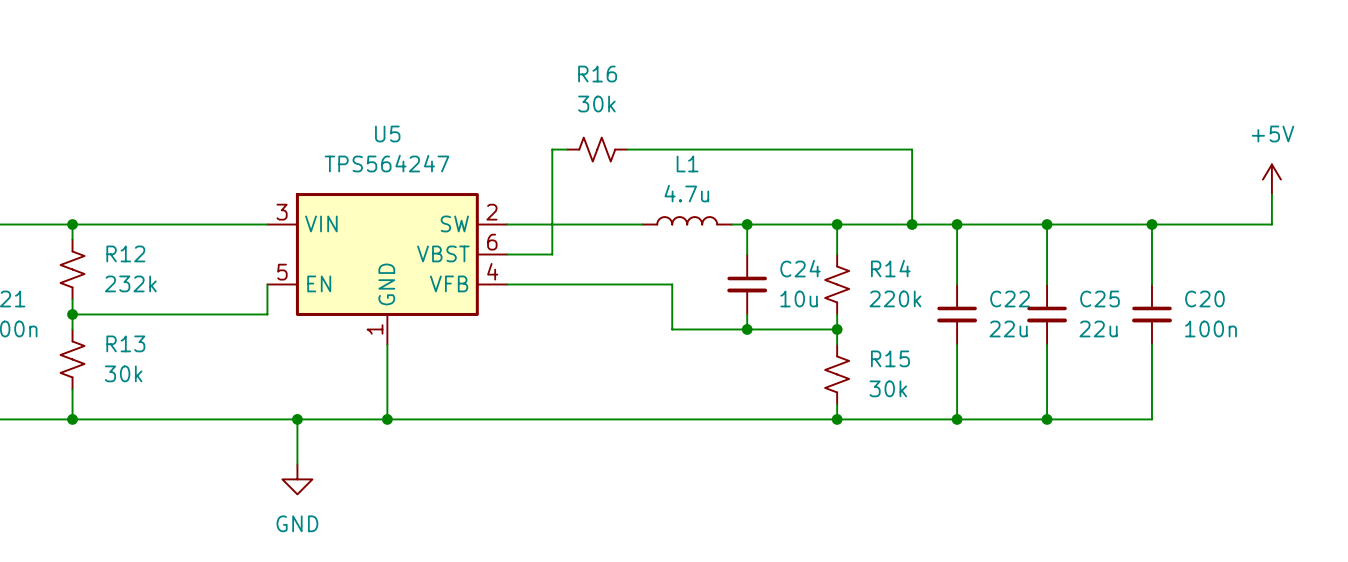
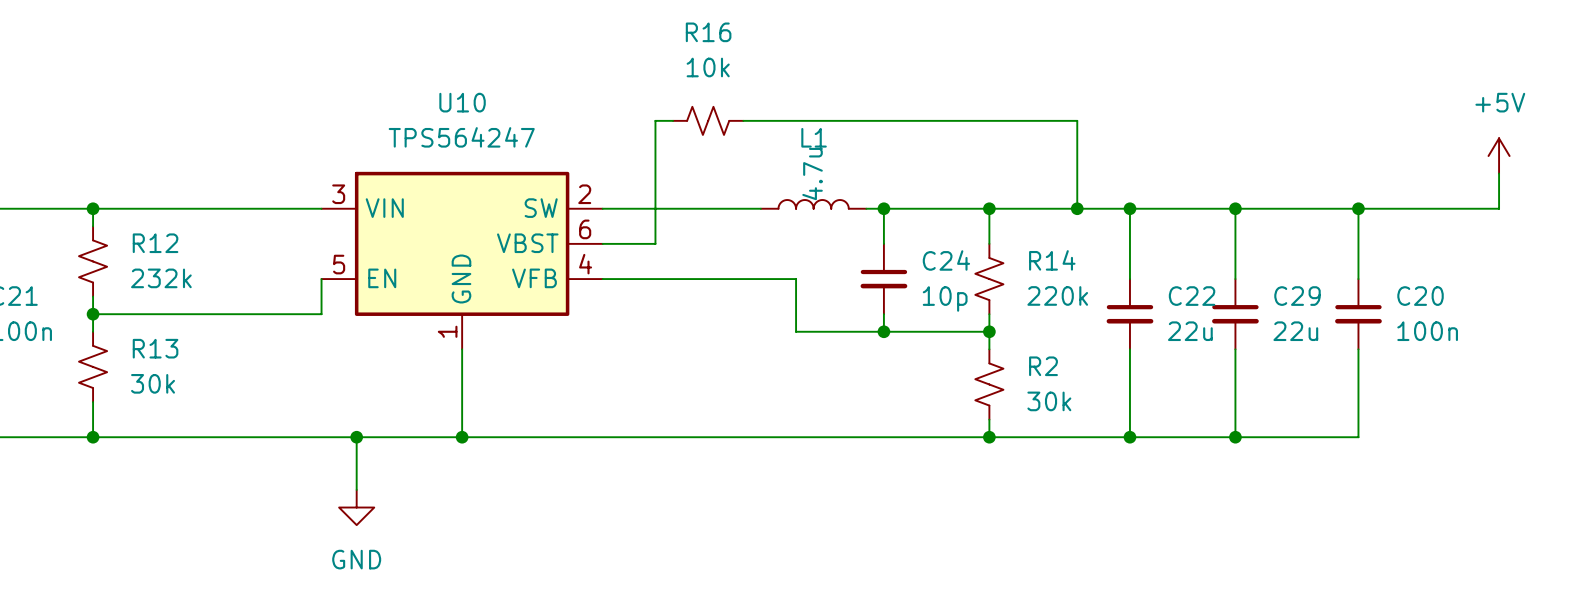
R16 value: 30k (596, 104) -> 10k (708, 67)
U5 name: U5 (387, 134) -> U10 (462, 102)
L1 value rotation: 0° (686, 193) -> 90° counterclockwise (812, 174)
C24 value: 10u (799, 298) -> 10p (945, 298)
C25 name: C25 (1099, 298) -> C29 (1297, 296)
R15 name: R15 (890, 358) -> R2 (1043, 366)

